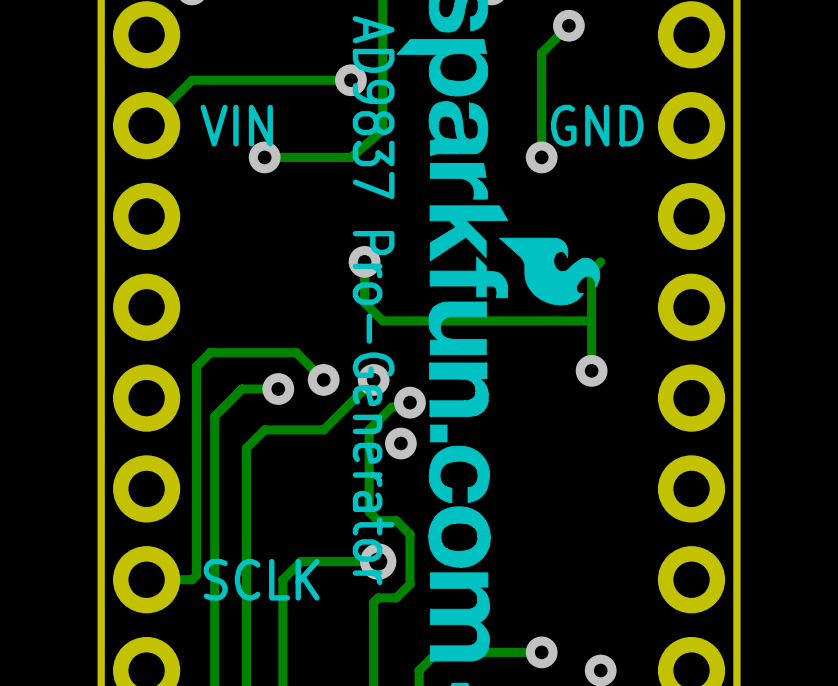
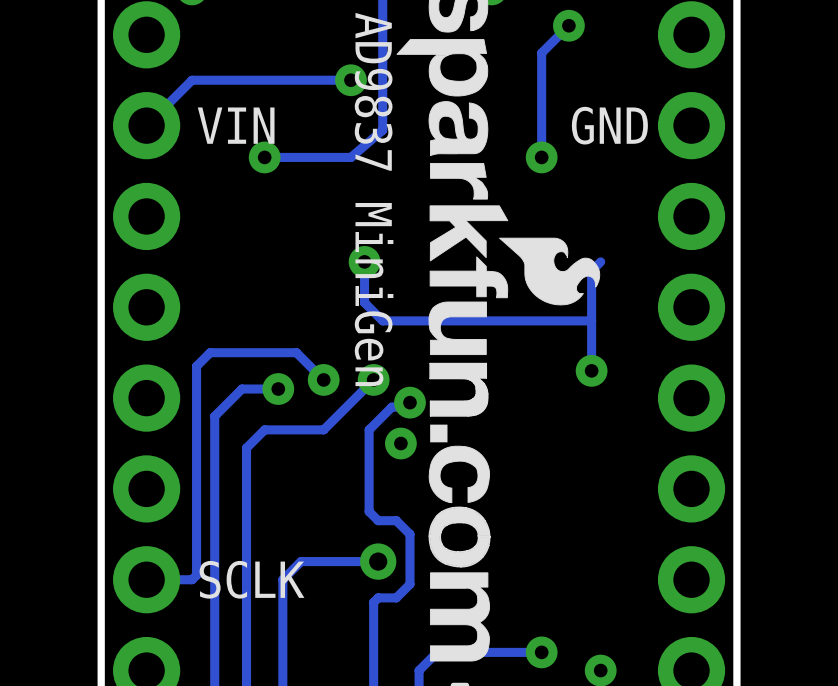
text: AD9837 Pro-Generator (373, 300) -> AD9837 MiniGen (374, 199)

